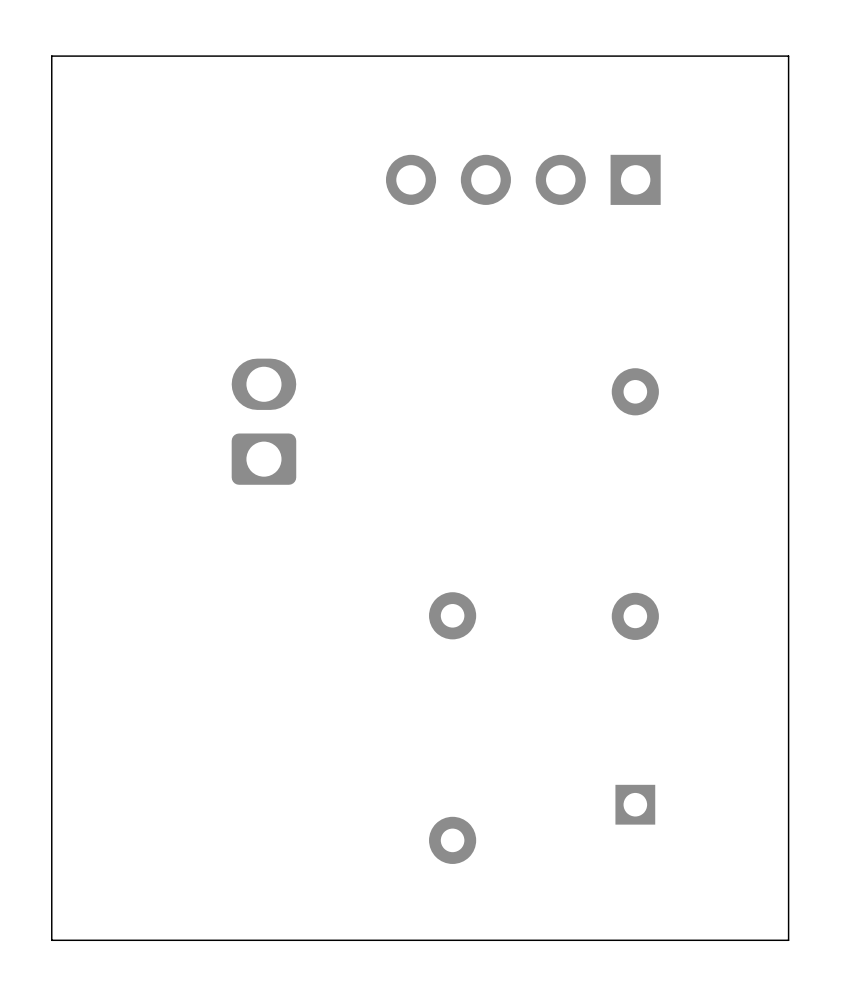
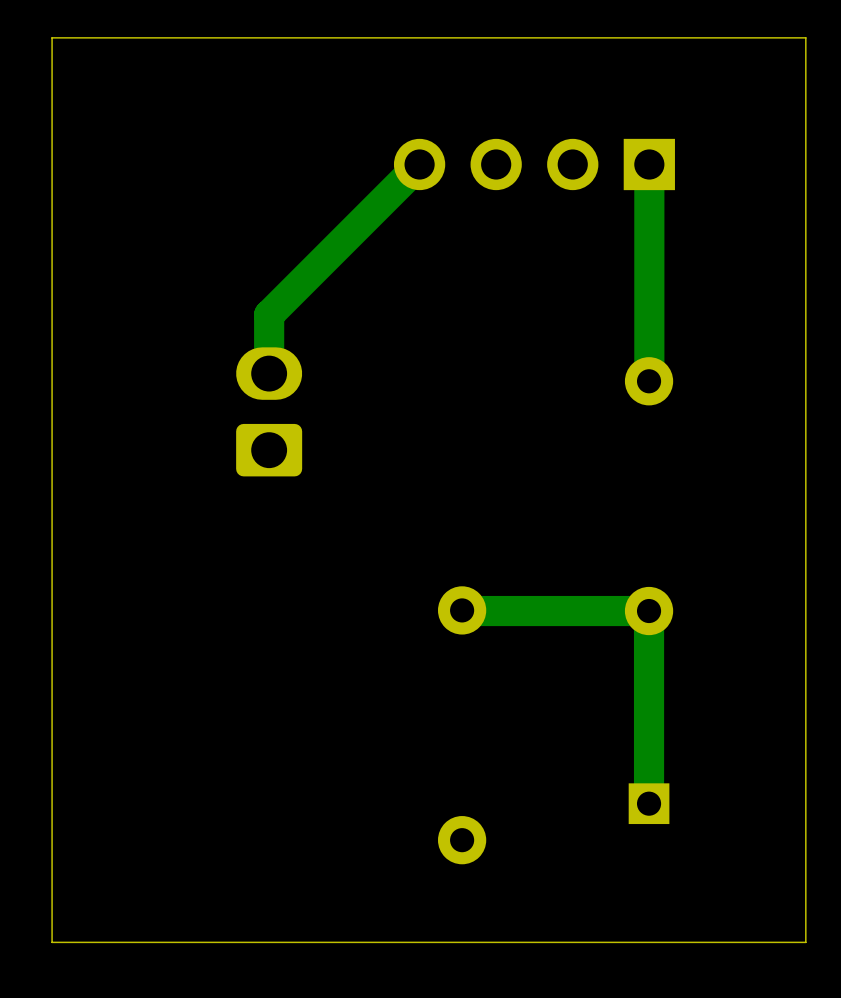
track: none -> (419, 164) (269, 314) (269, 373)
track: none -> (649, 164) (649, 380)
track: none -> (462, 610) (649, 611) (649, 803)

